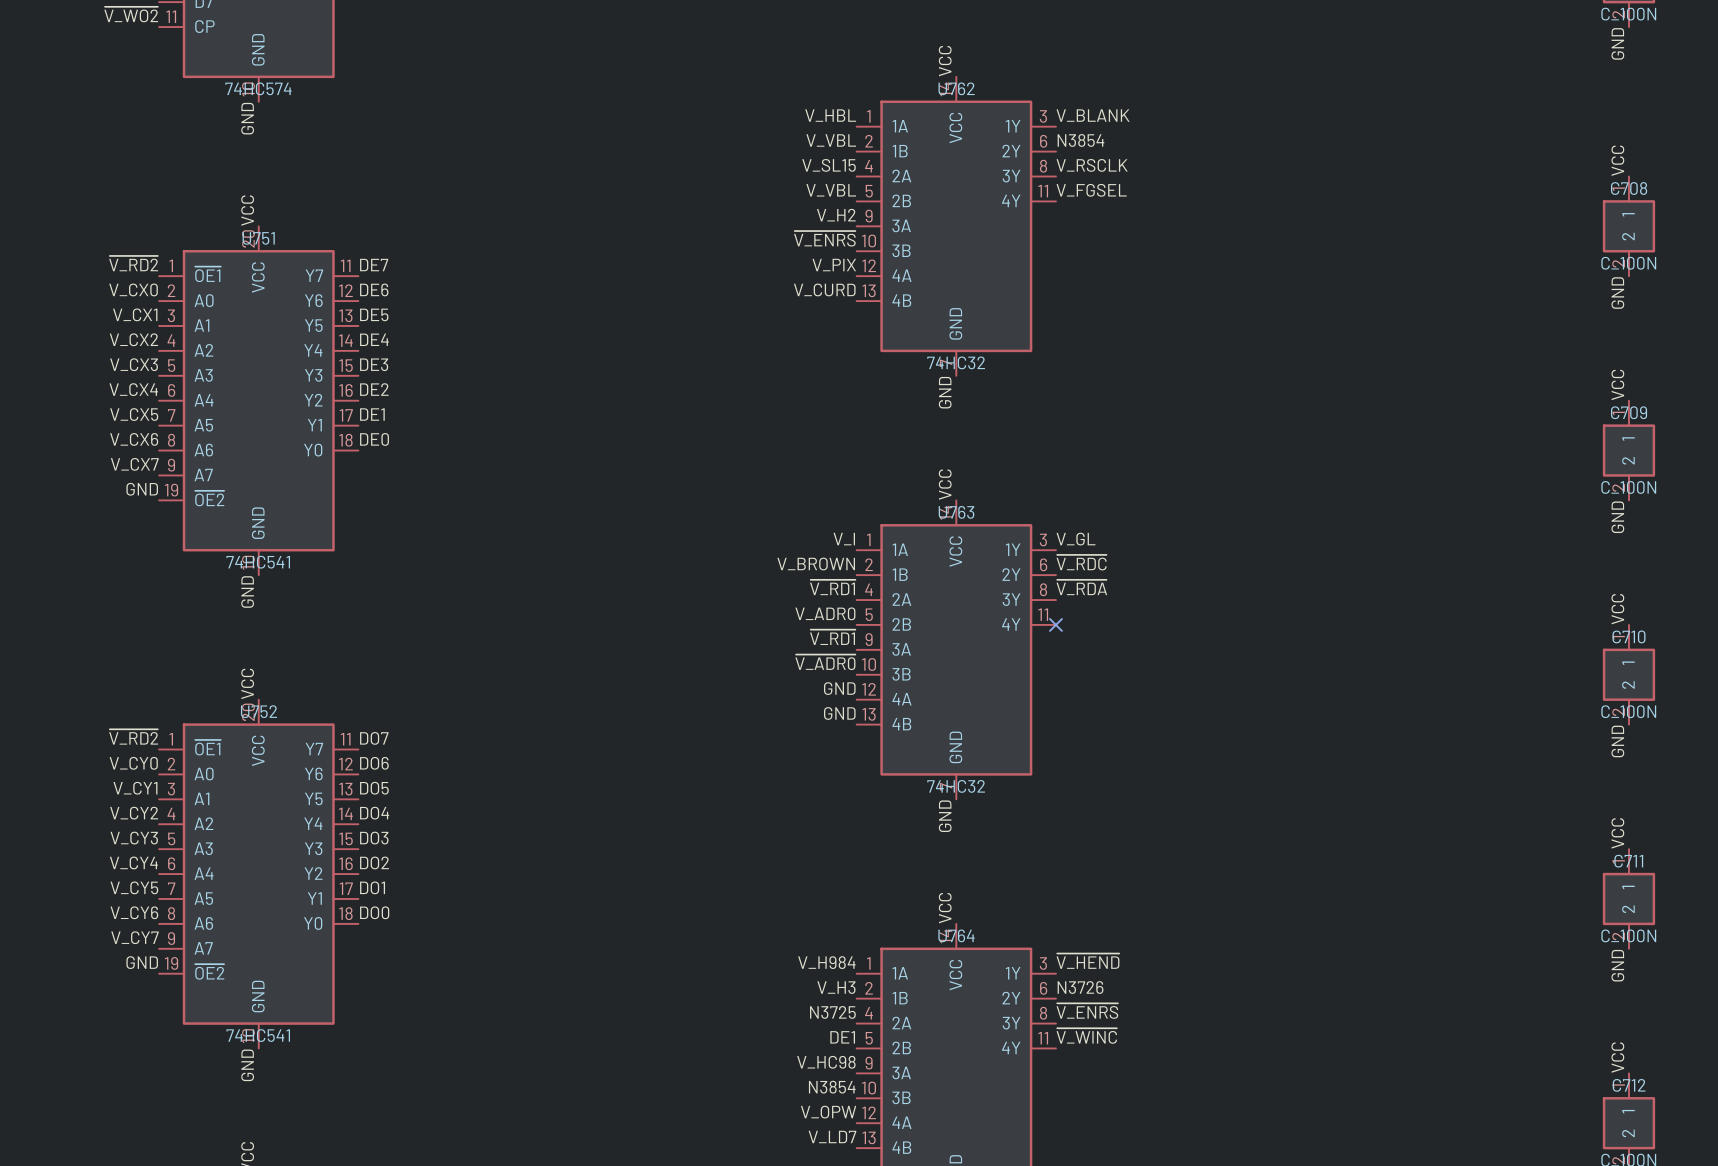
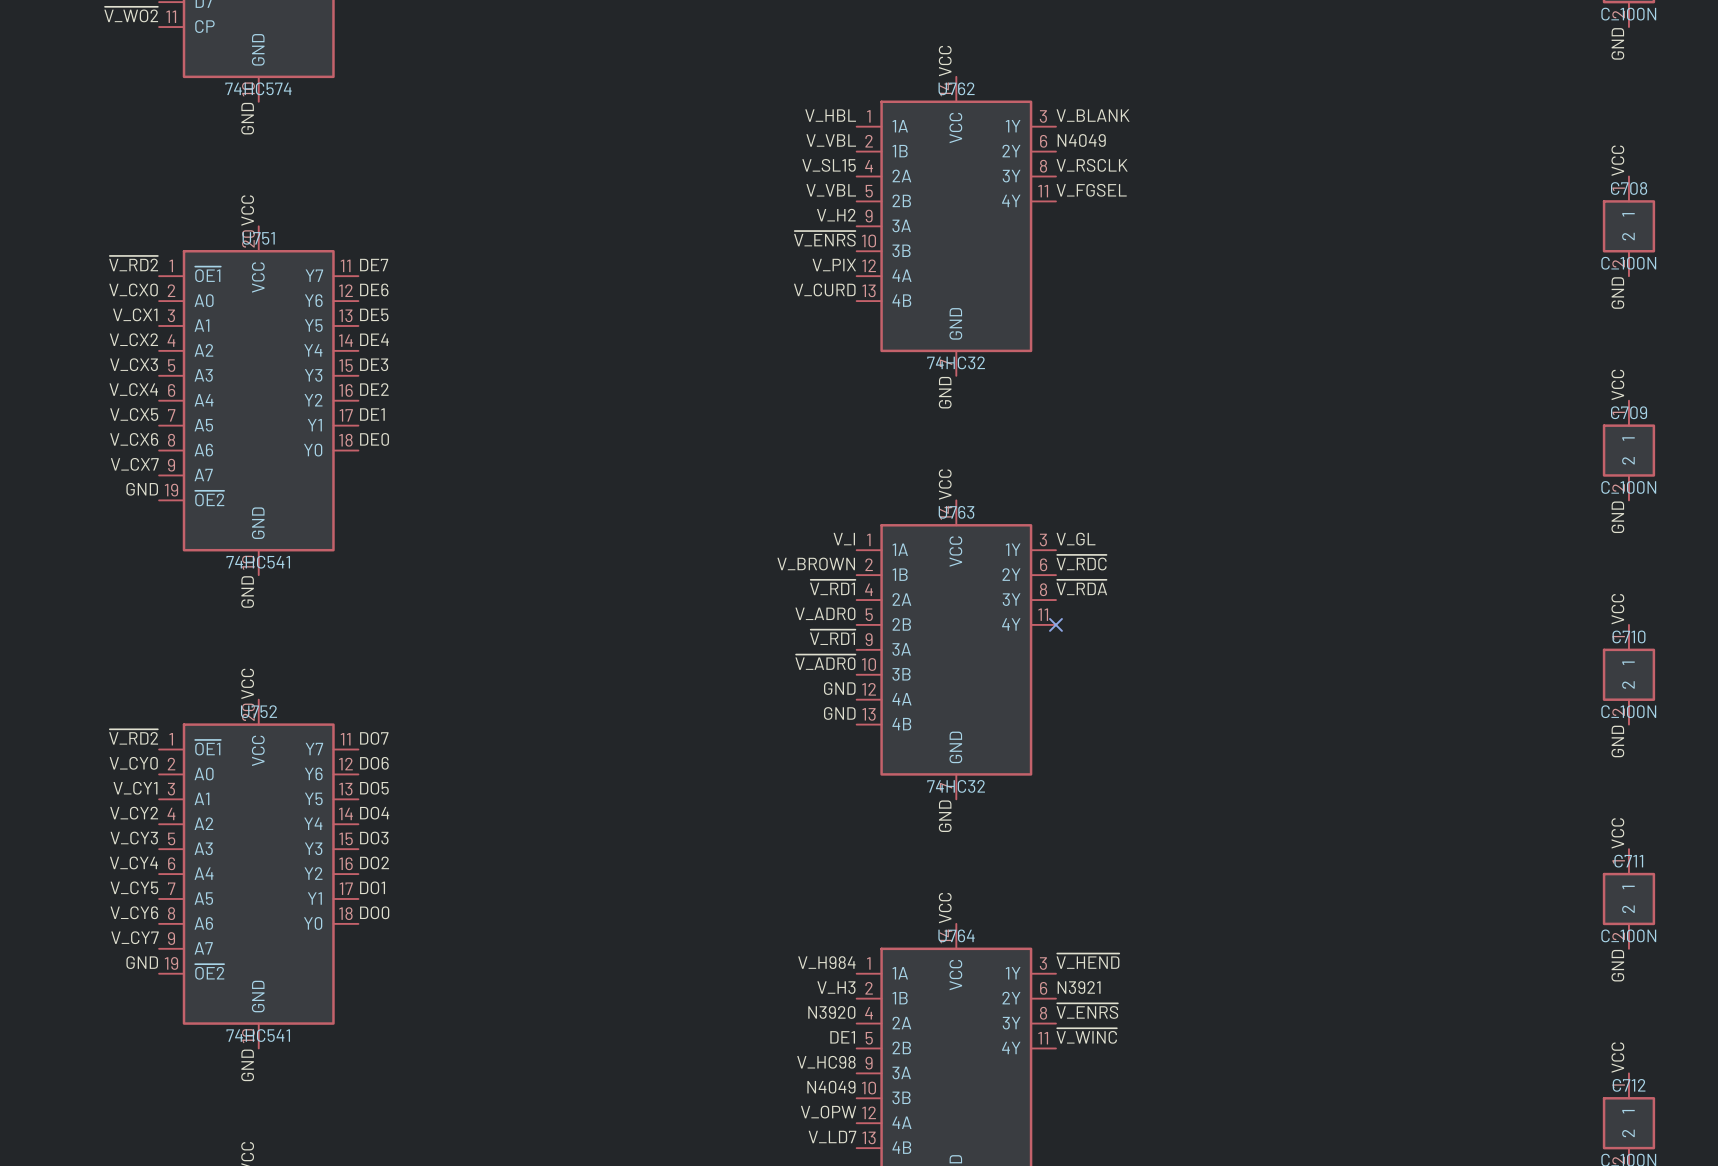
label: N3854 (1080, 140) -> N4049 (1081, 140)
label: N3726 (1080, 987) -> N3921 (1079, 987)
label: N3725 (832, 1012) -> N3920 (831, 1012)
label: N3854 (832, 1087) -> N4049 (831, 1087)

